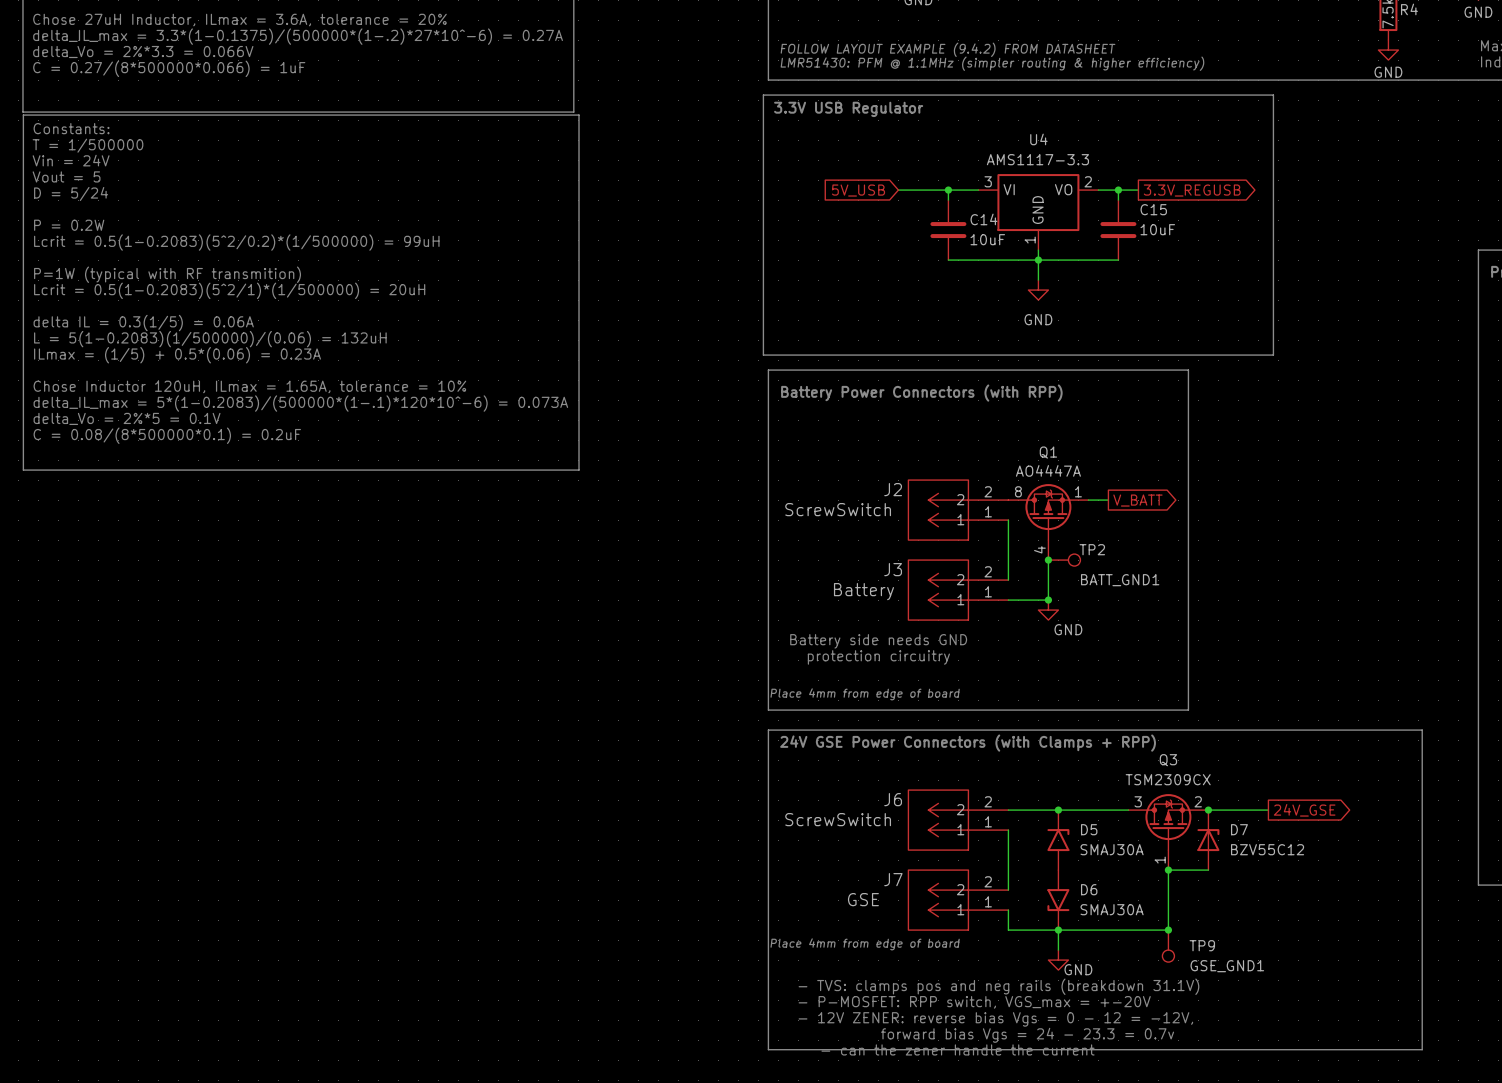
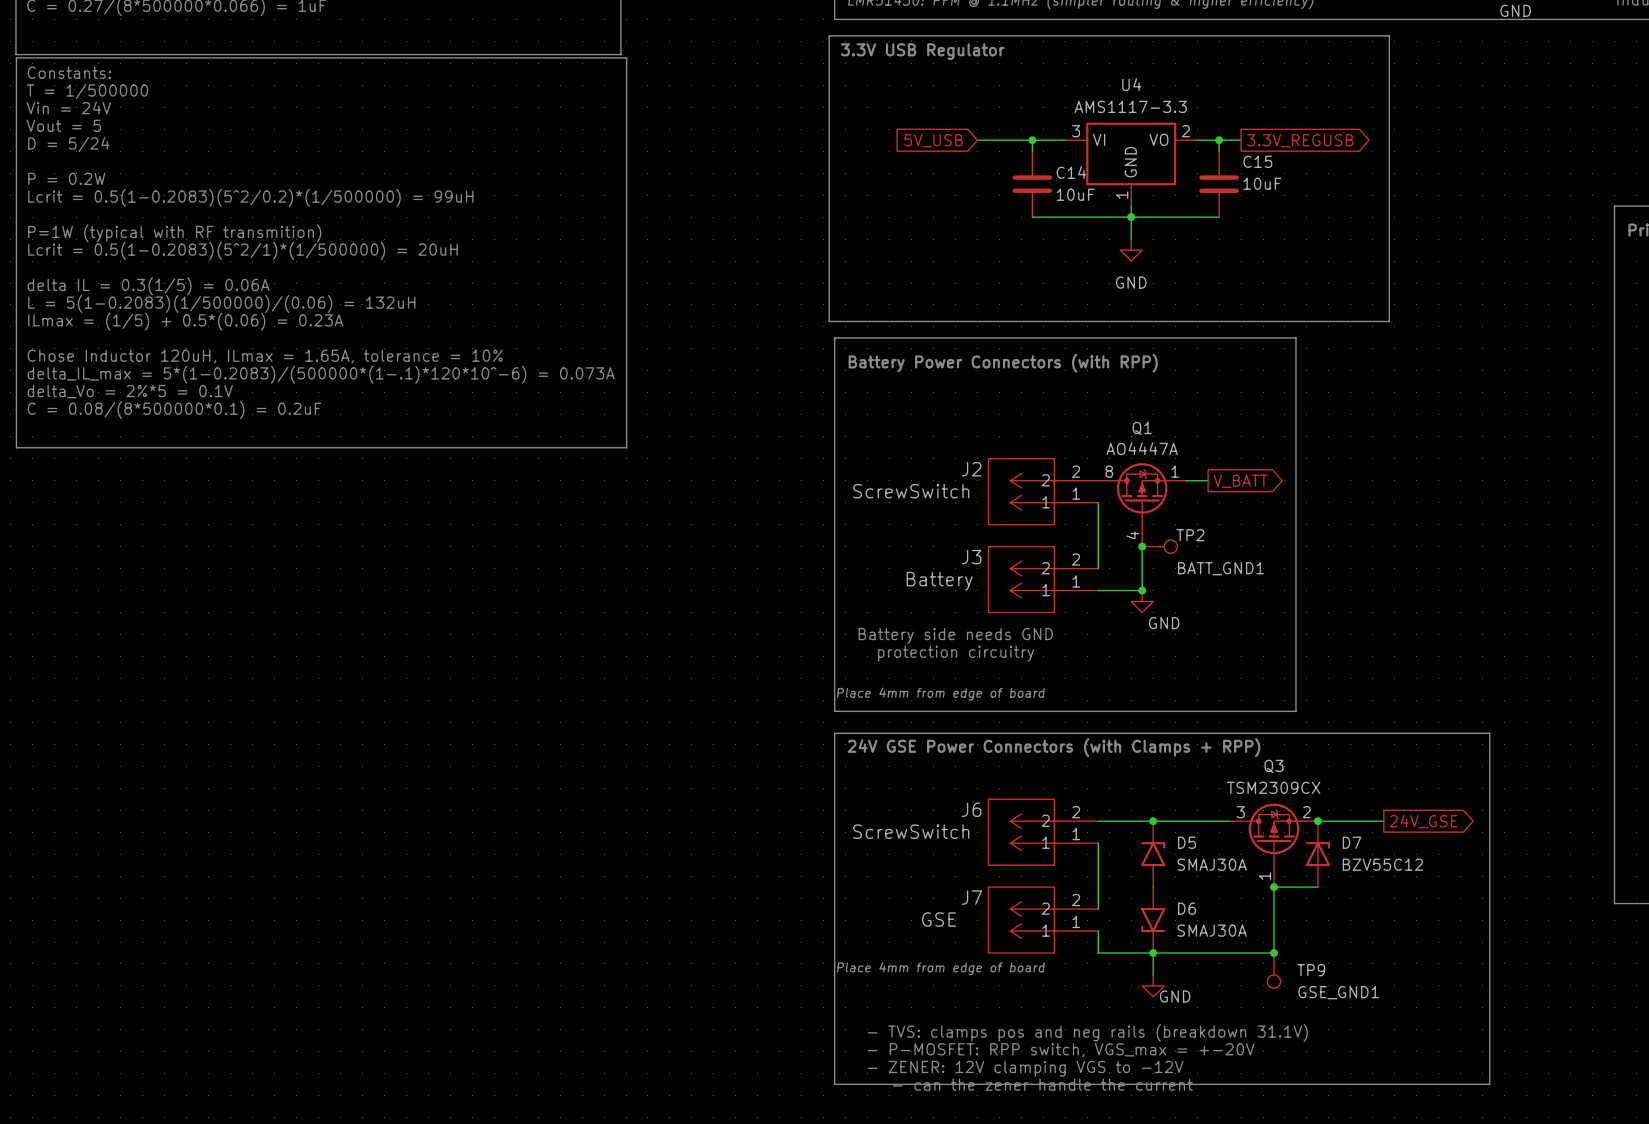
line: (1364, 730) (1422, 730) (1422, 1049) (1364, 1049) -> (1489, 733) (1489, 1084)
text: - TVS: clamps pos and neg rails (breakdown 31.1V) (998, 986) -> none
text: - P-MOSFET: RPP switch, VGS_max = +-20V (974, 1002) -> - TVS: clamps pos and neg rails (breakdown 31.1V) (1087, 1032)
text: - 12V ZENER: reverse bias Vgs = 0 - 12 = -12V, (995, 1019) -> - P-MOSFET: RPP switch, VGS_max = +-20V (1061, 1050)
text: forward bias Vgs = 24 - 23.3 = 0.7v (1027, 1035) -> - ZENER: 12V clamping VGS to -12V (1025, 1068)

